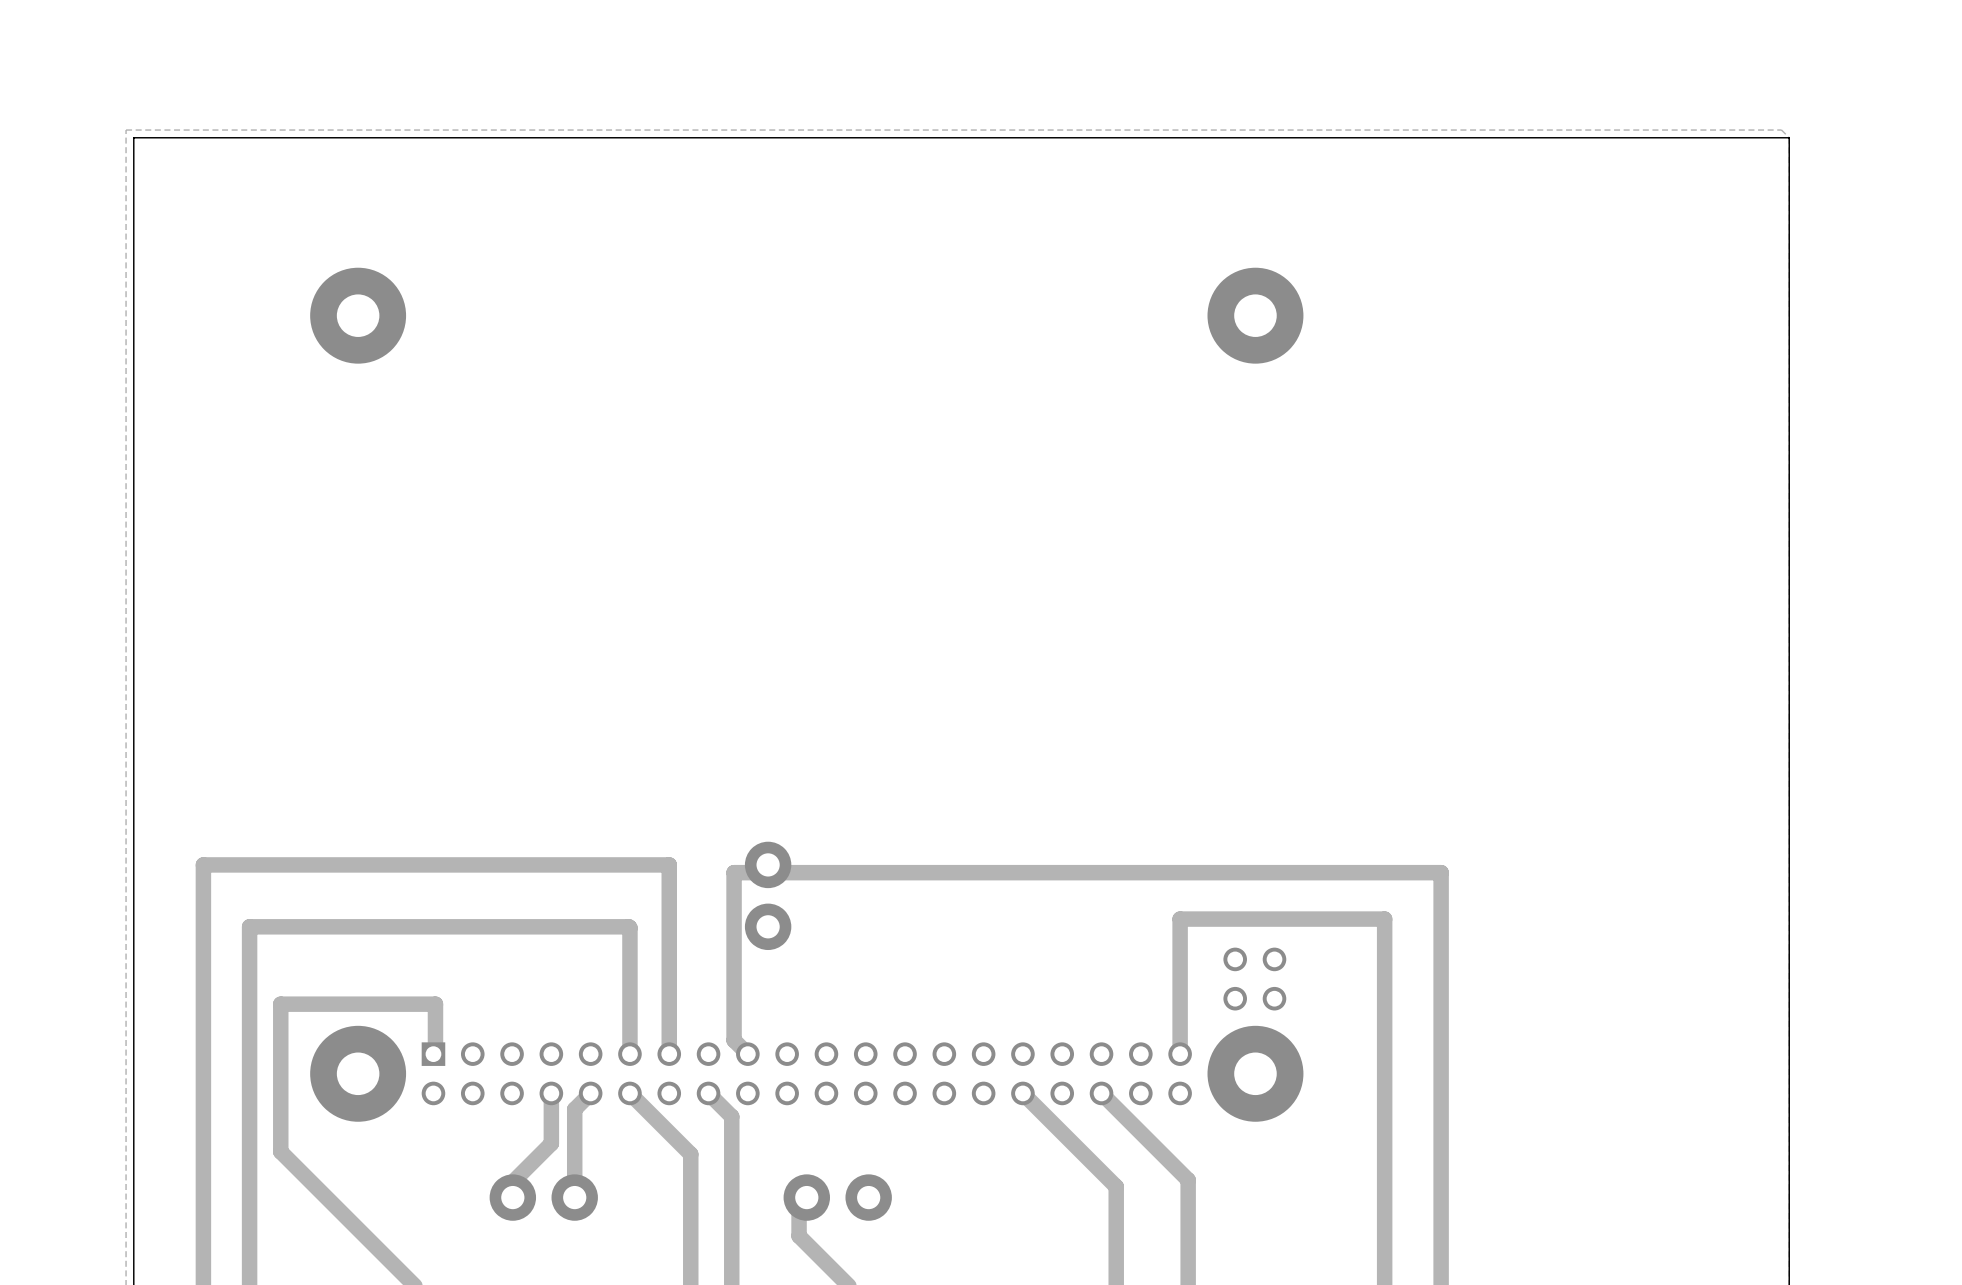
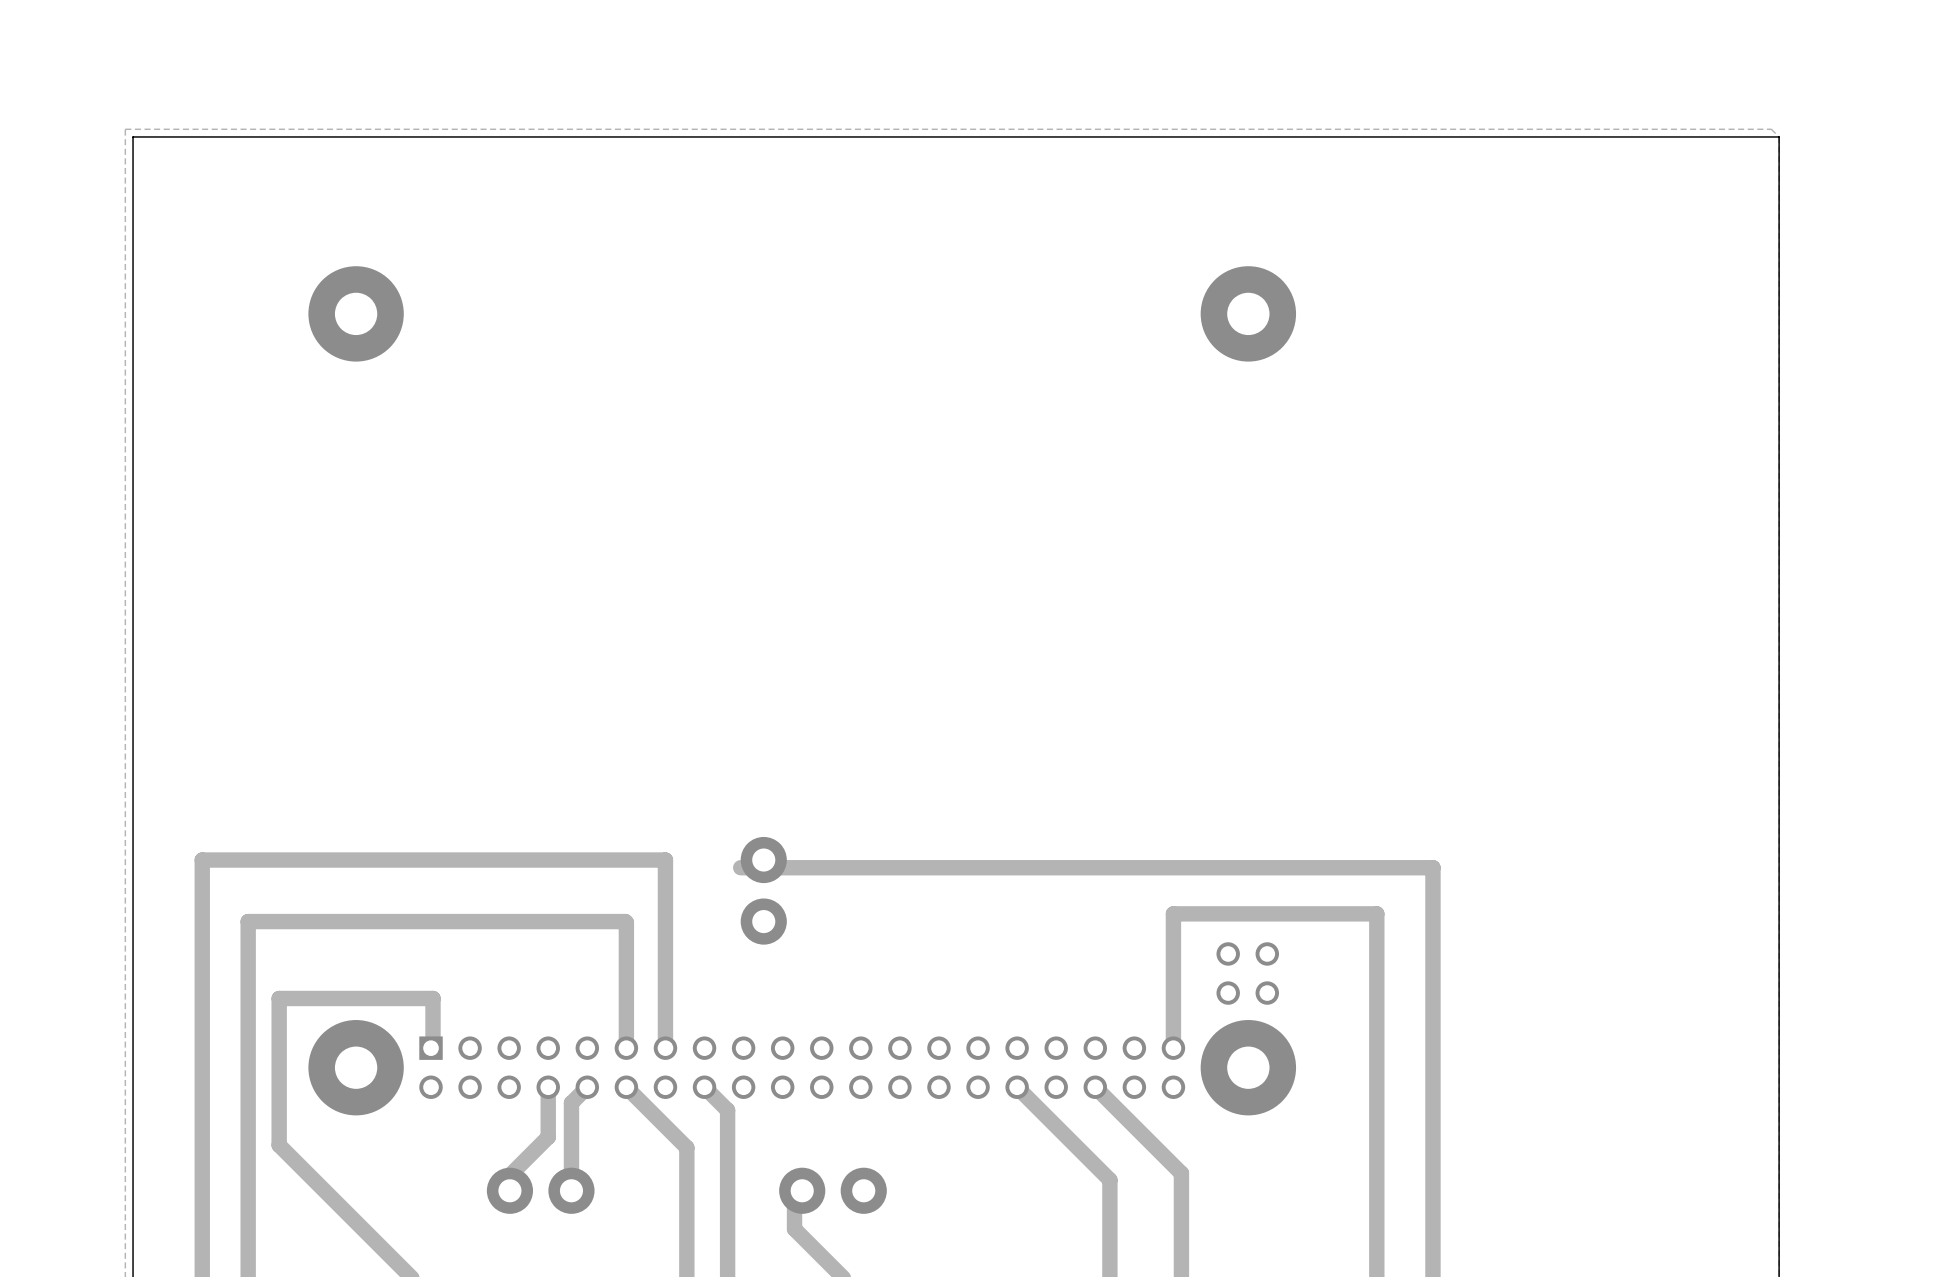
track: (744, 872) (734, 872) (734, 1040) (744, 1051) -> none

